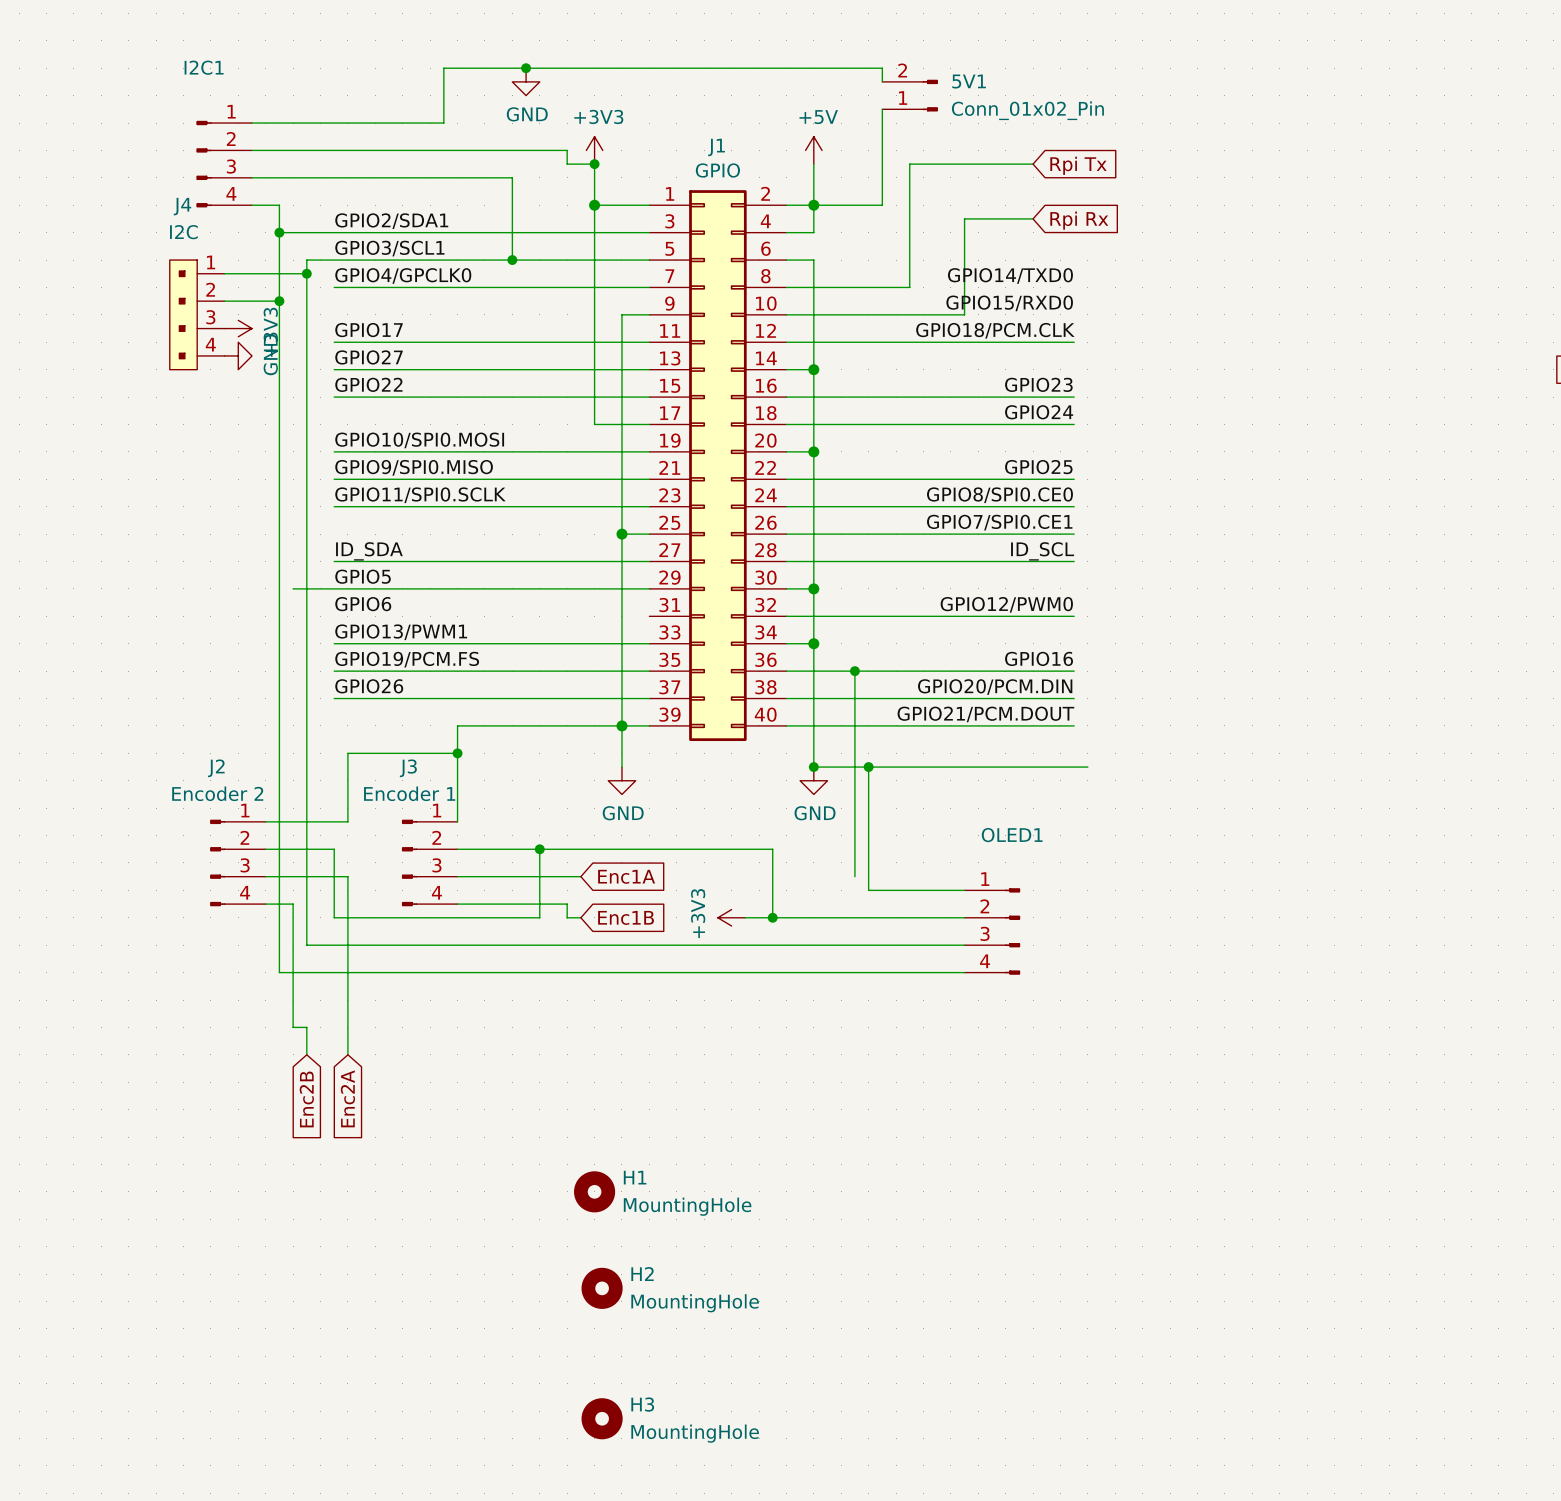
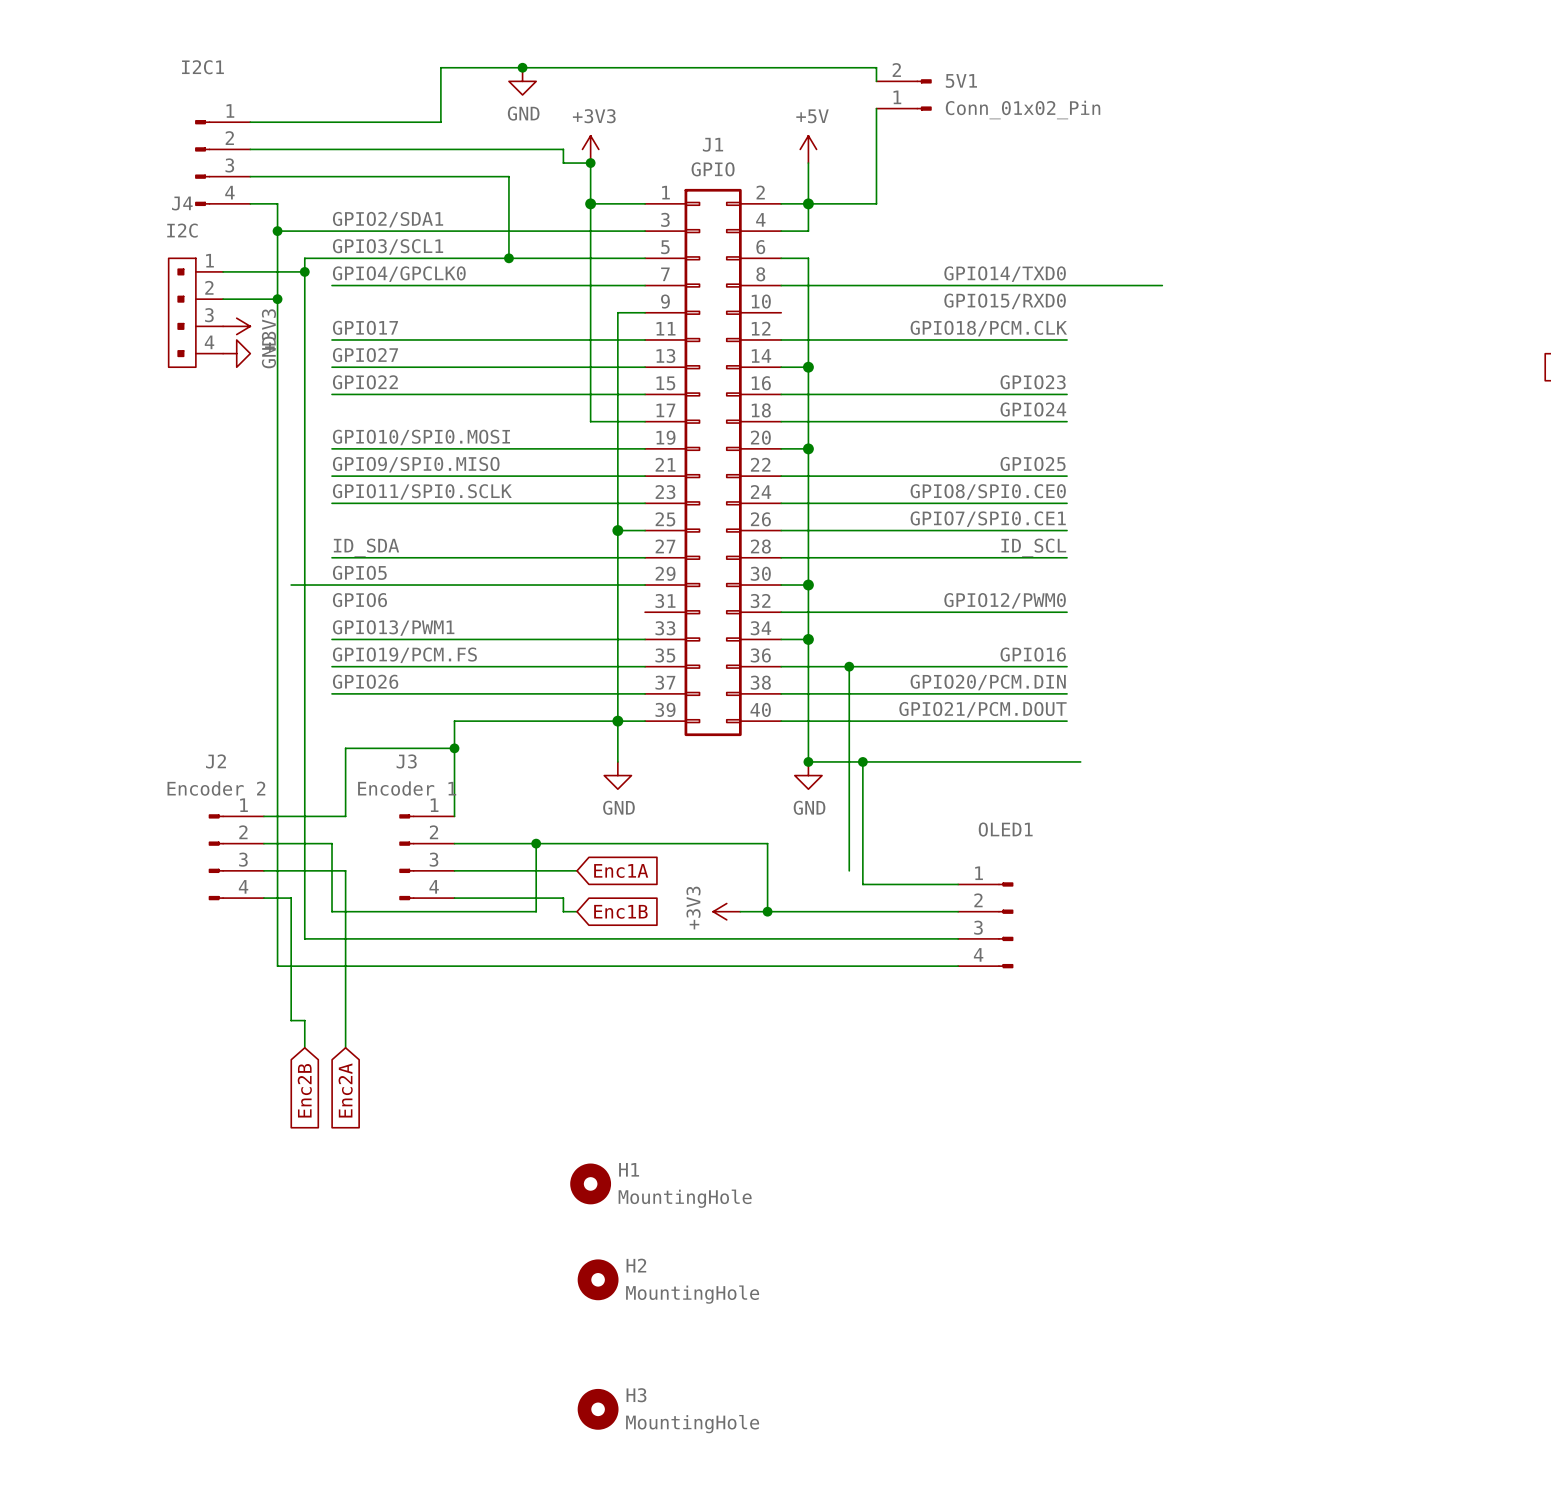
wire: (1033, 164) (909, 164) (909, 287) -> (1162, 285) (903, 285)
global label: Rpi Tx (1078, 165) -> none
wire: (1033, 218) (964, 218) (964, 314) (786, 314) -> none
global label: Rpi Rx (1079, 220) -> none

